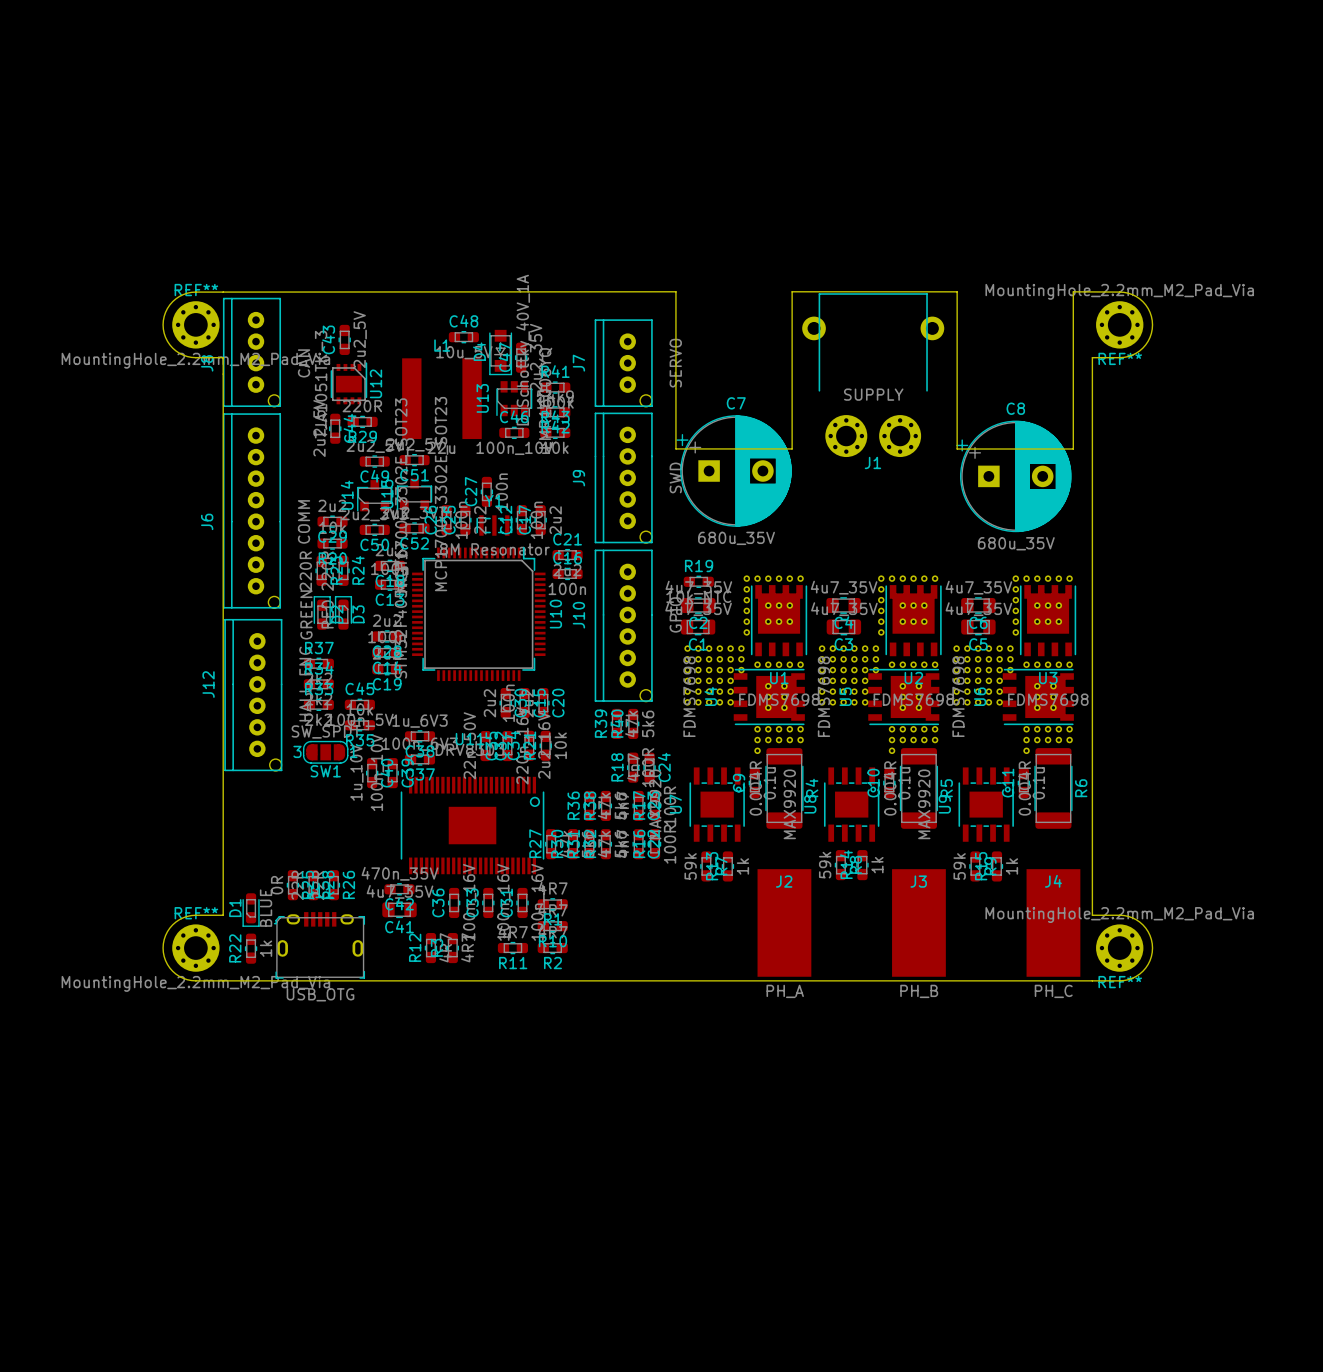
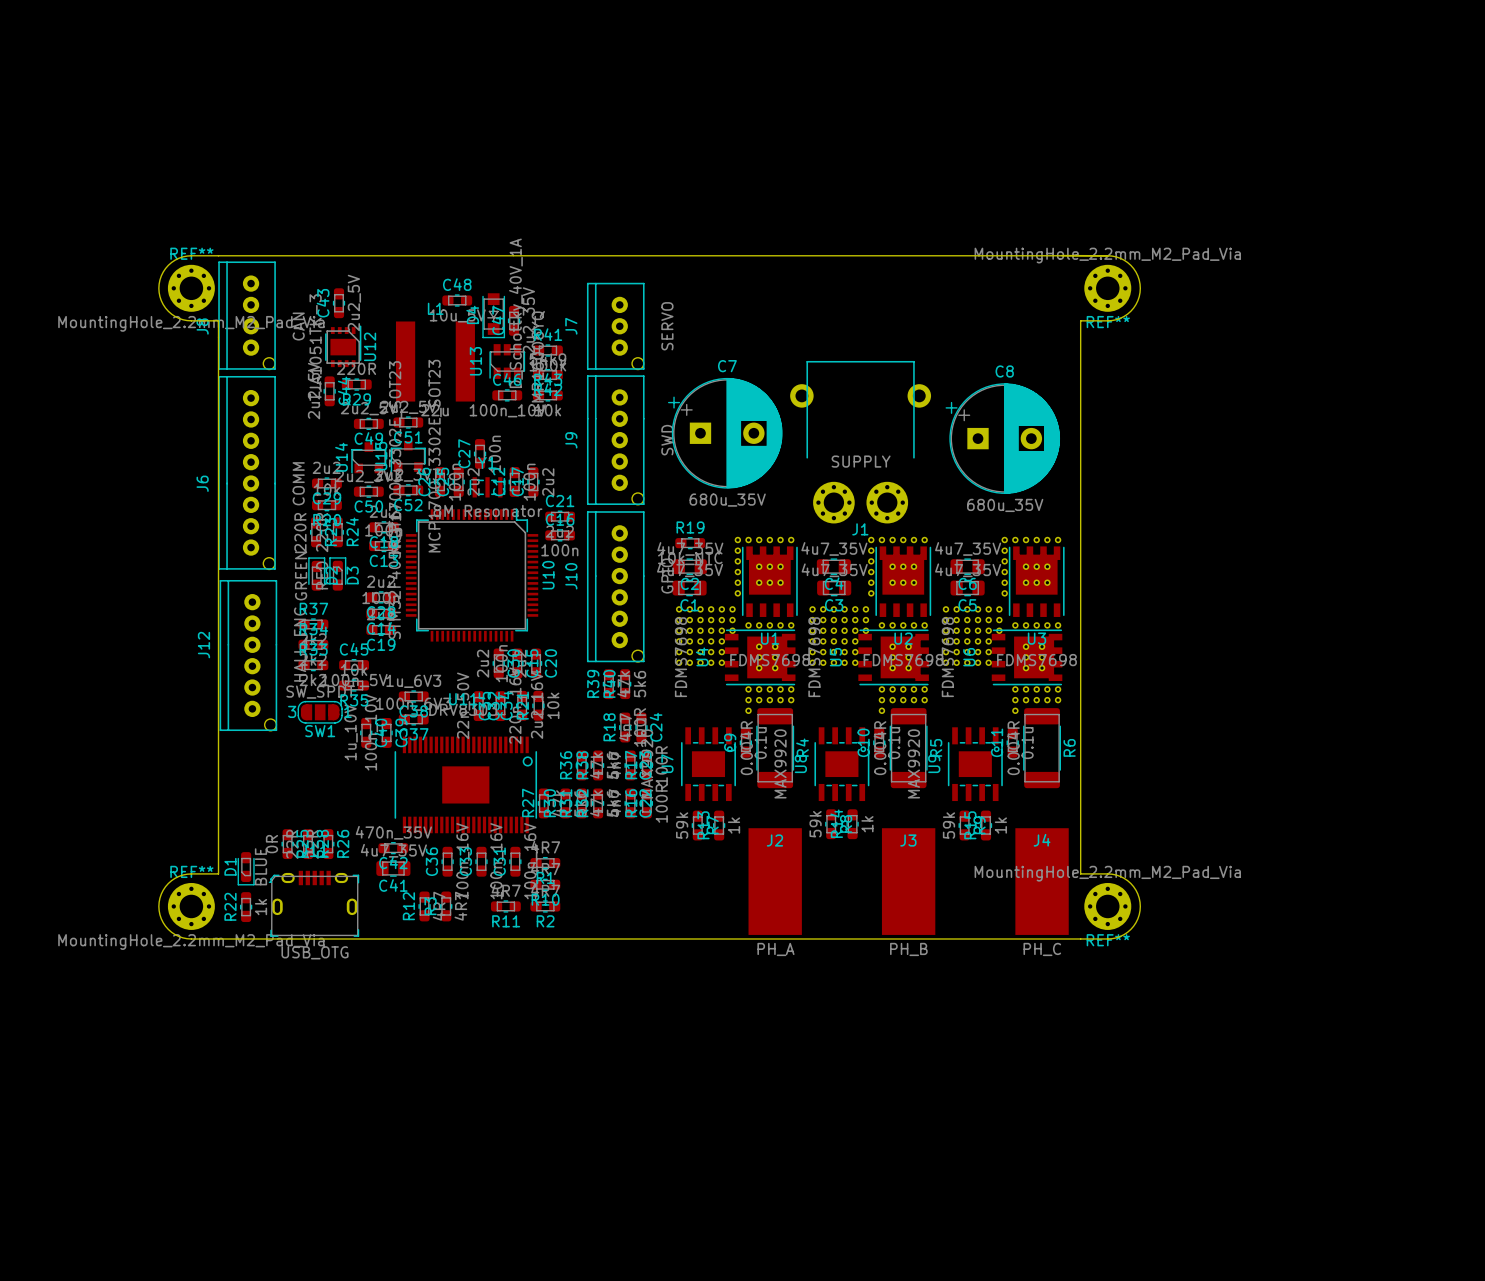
board edge: (1073, 291) (1073, 449) (957, 449) (957, 291) (792, 291) (792, 448) (675, 448) (675, 291) (223, 292) -> (1107, 255) (218, 255)
J1 position: (873, 375) -> (860, 442)

